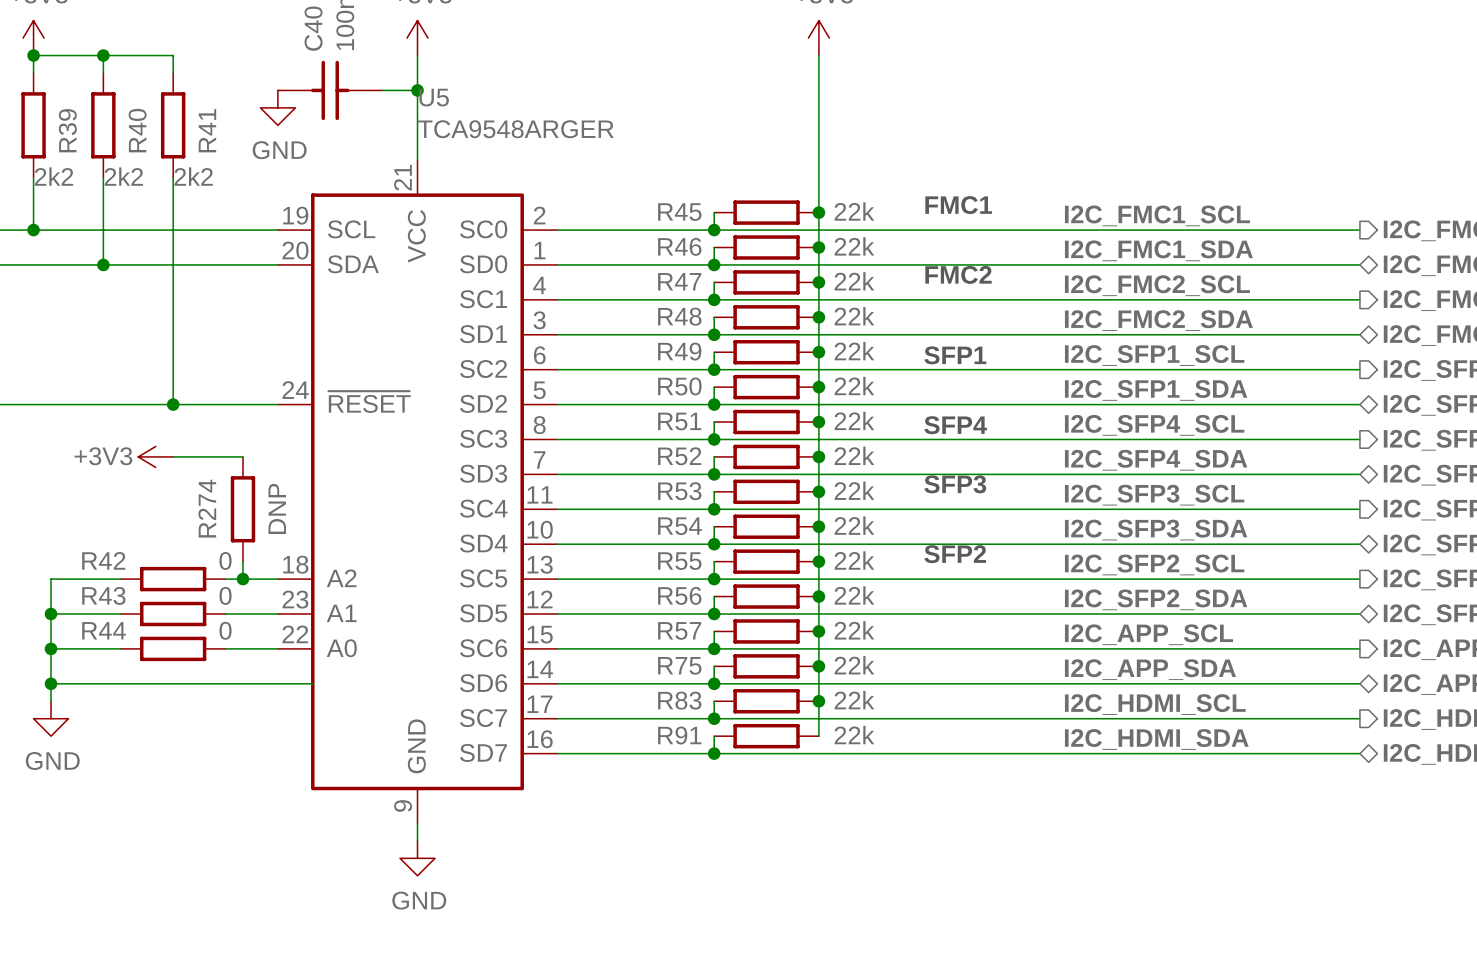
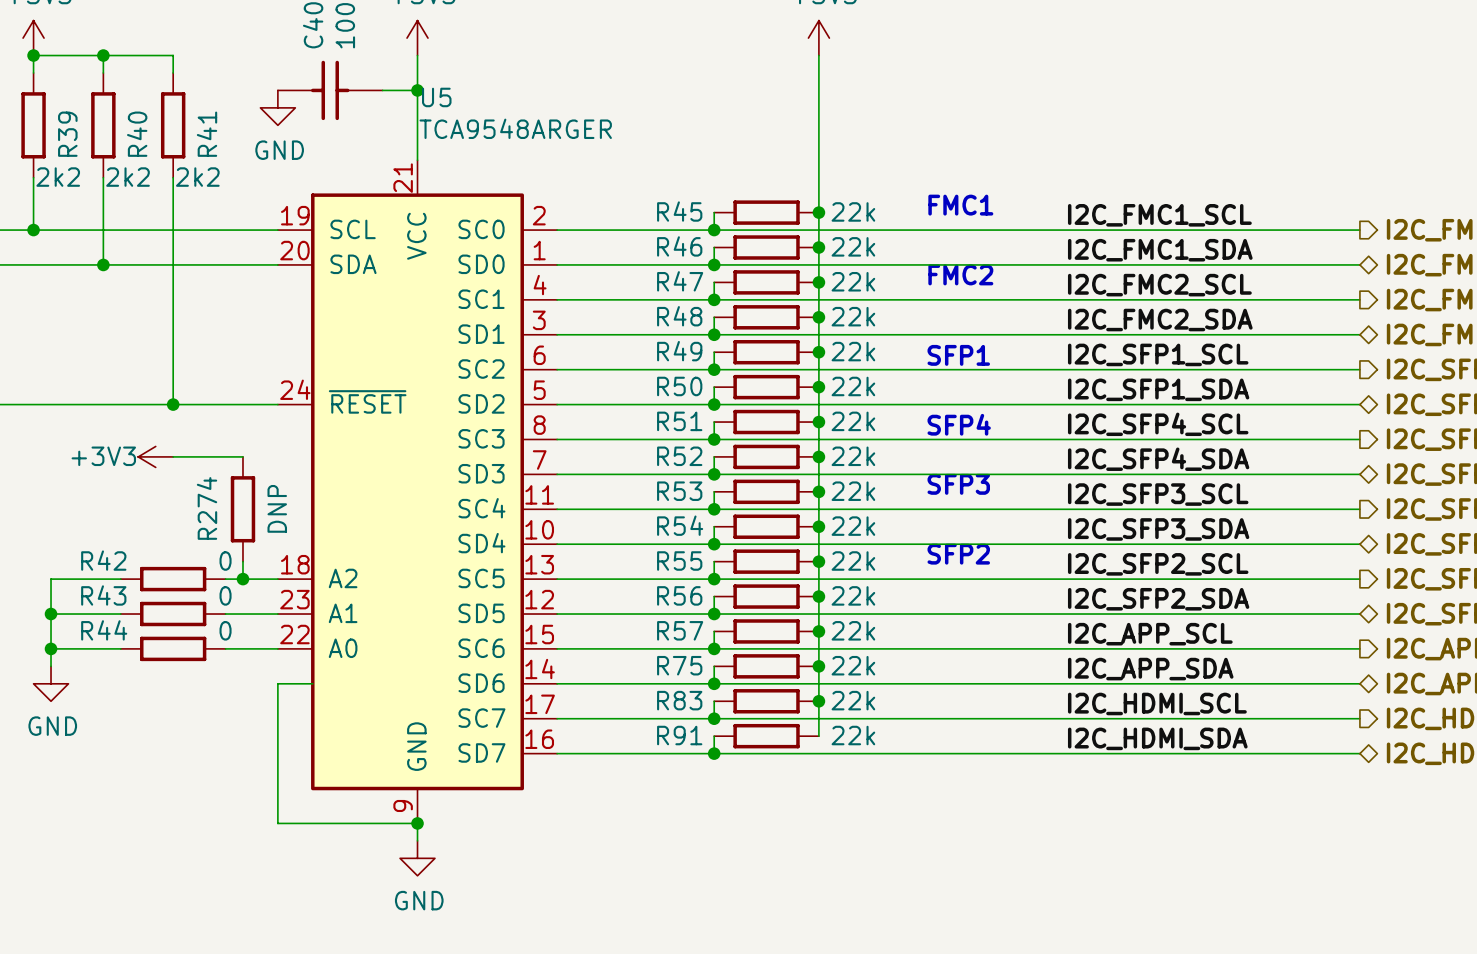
wire: (51, 683) (277, 683) -> (417, 823) (277, 823) (277, 683)
junction: (51, 683) -> none
power symbol position: GND (51, 718) -> GND (51, 683)
junction: none -> (417, 823)

